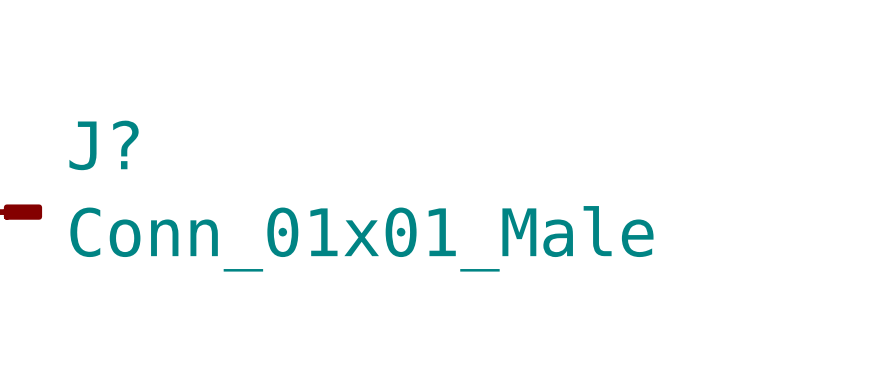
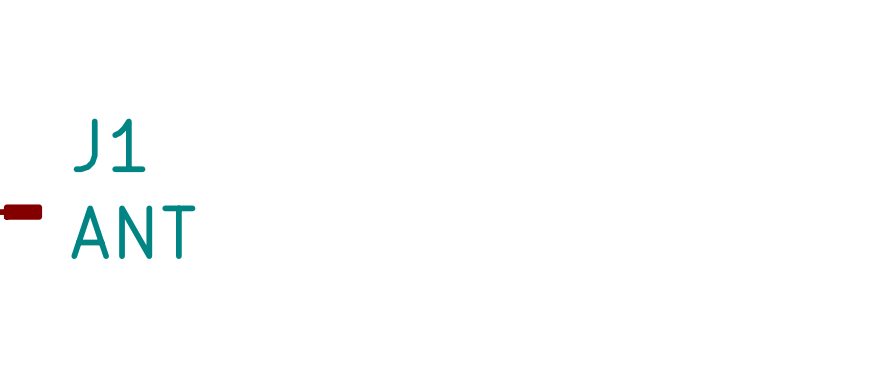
J? name: J? (104, 145) -> J1 (109, 145)
J? value: Conn_01x01_Male (361, 238) -> ANT (133, 232)

